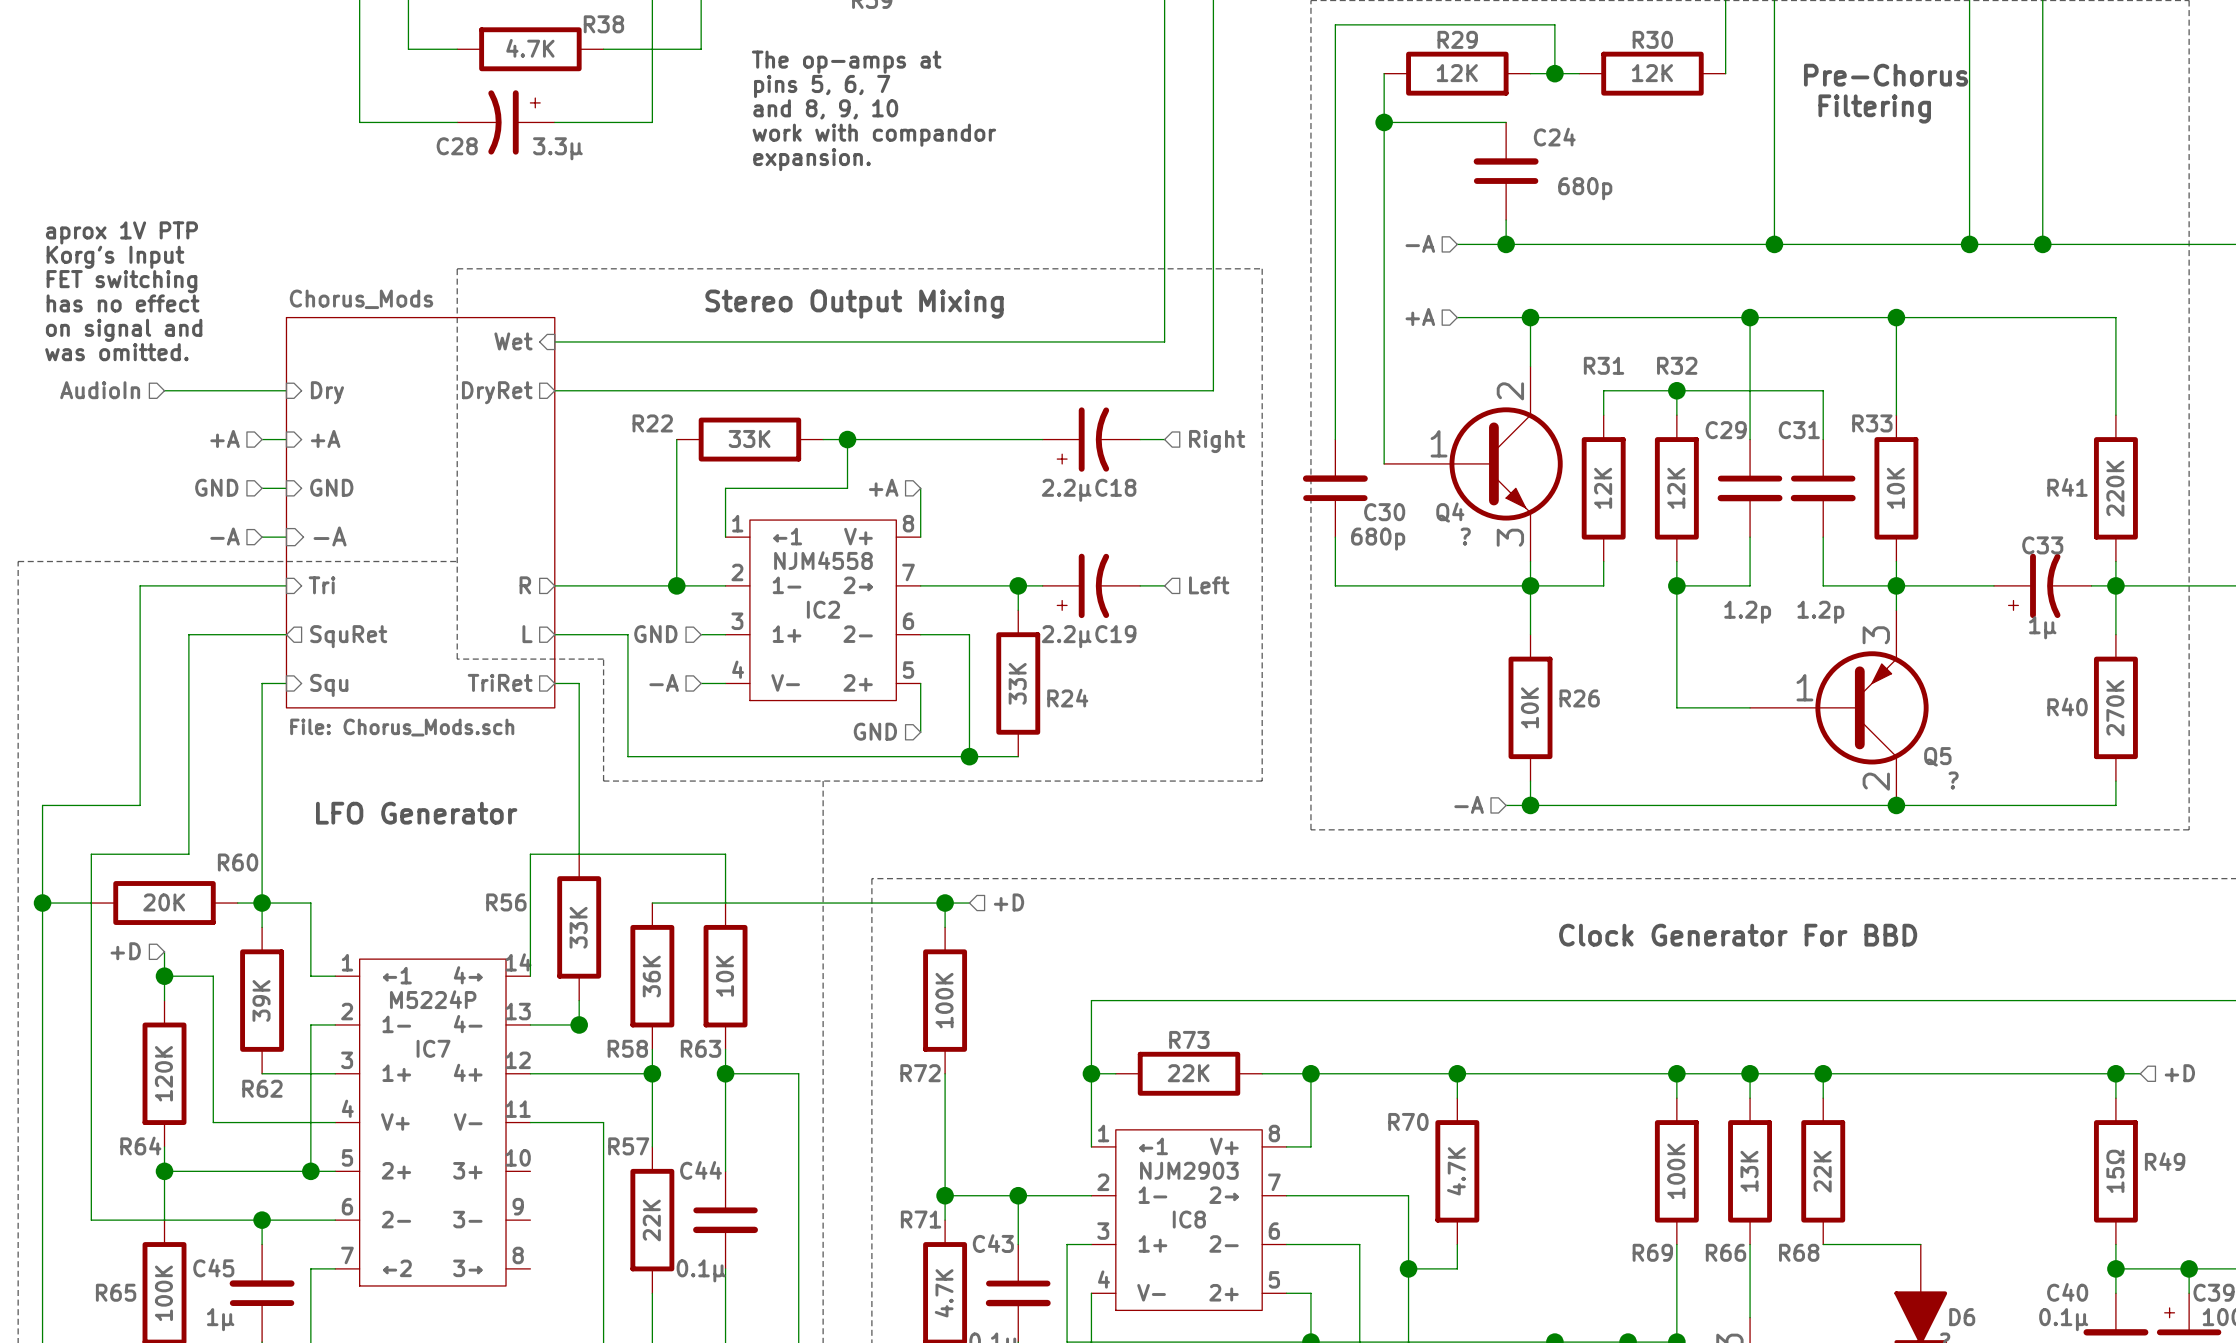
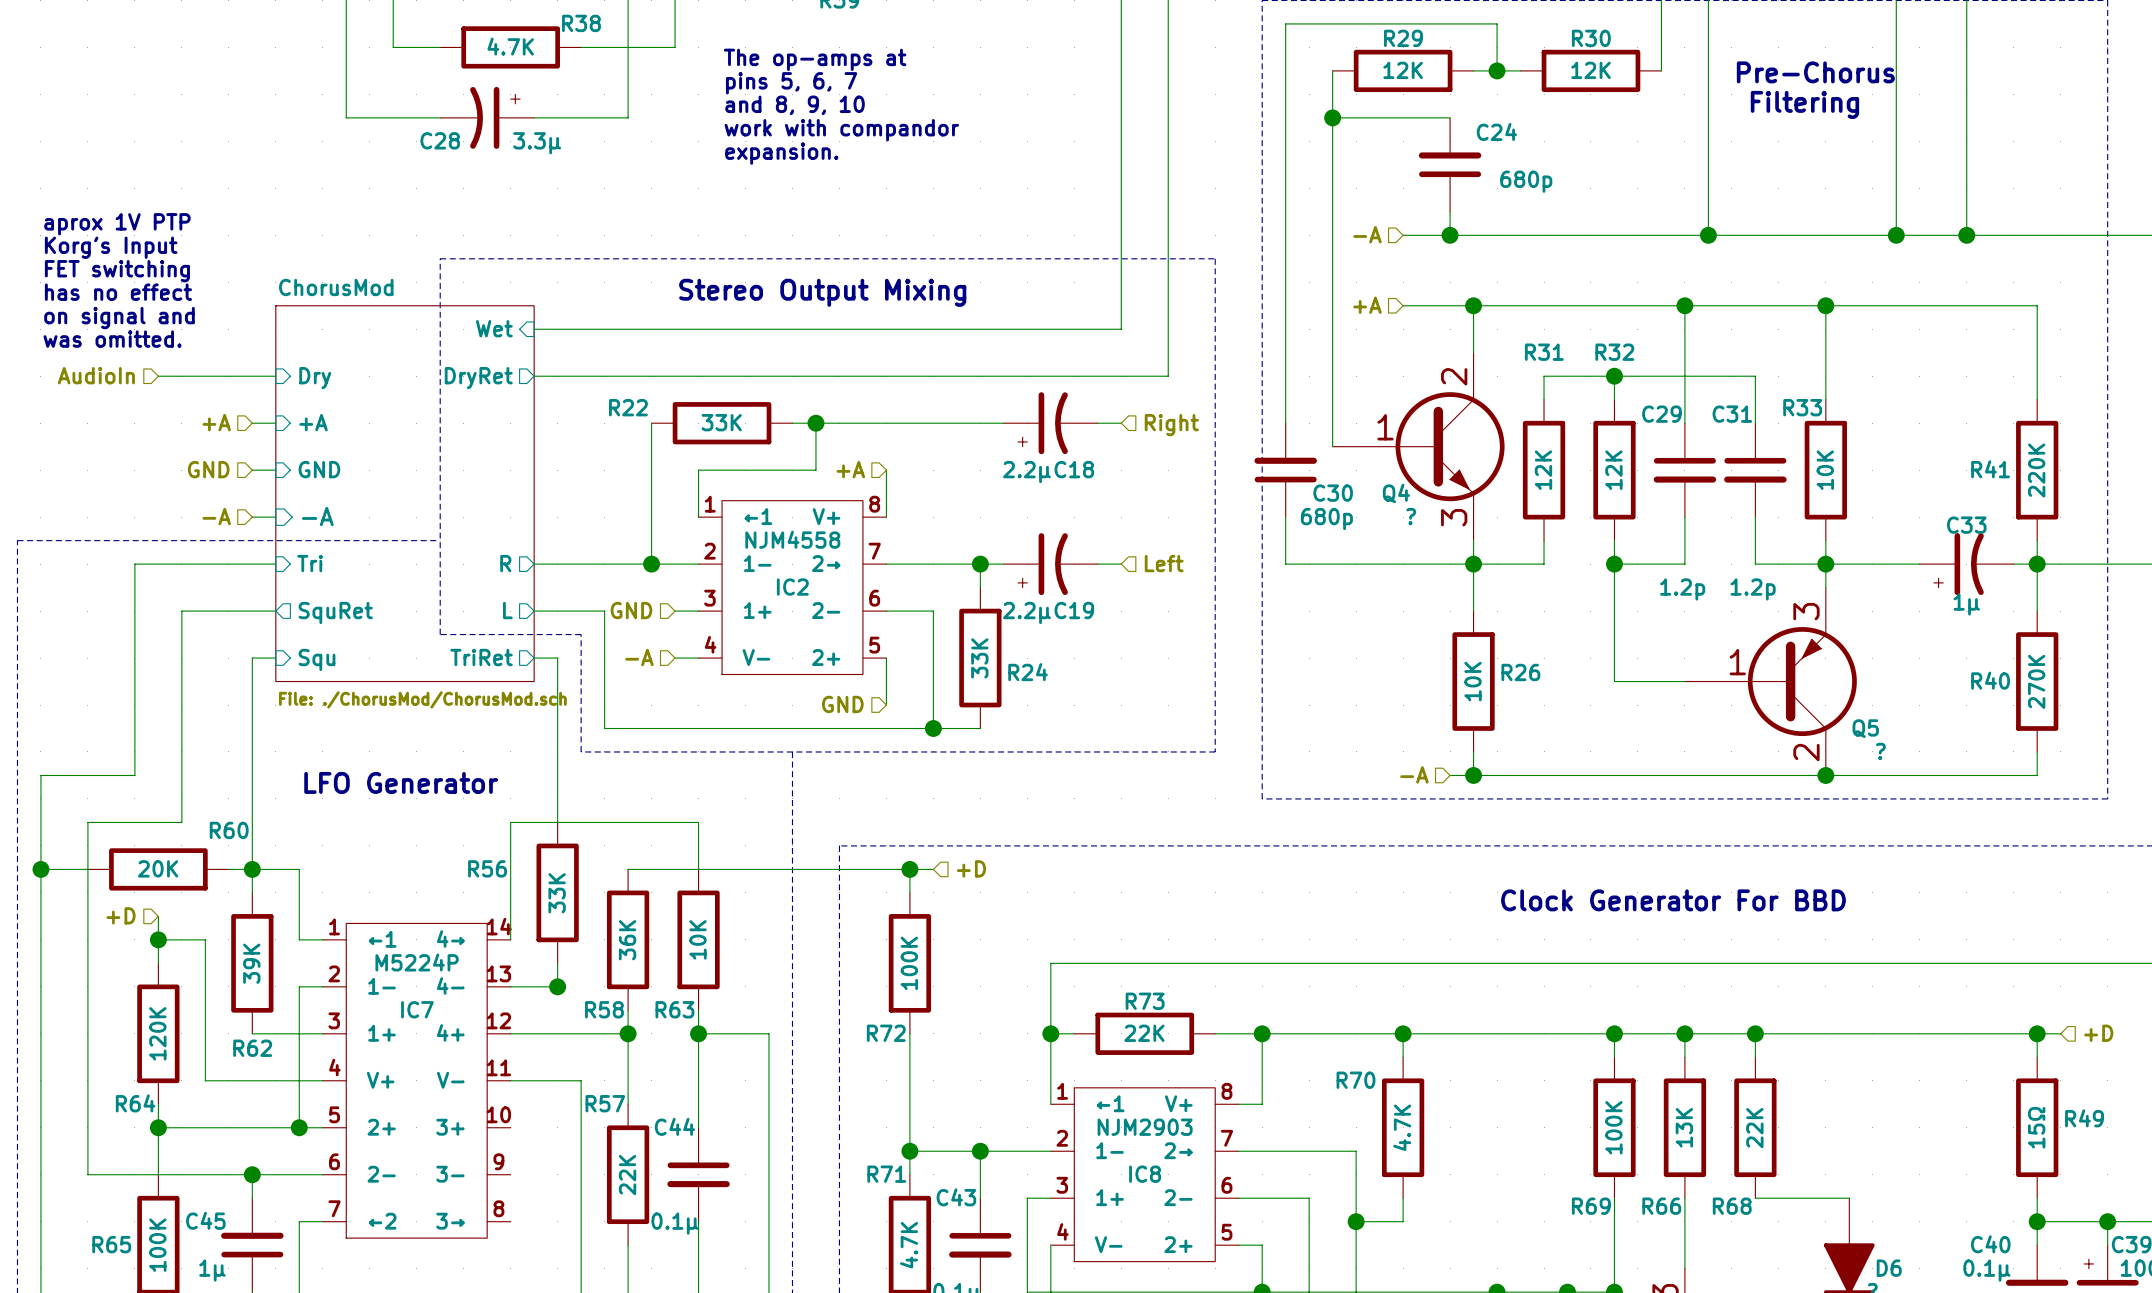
sheet Chorus_Mods name: Chorus_Mods (361, 299) -> ChorusMod (336, 287)
sheet Chorus_Mods value: File: Chorus_Mods.sch (402, 727) -> File: ./ChorusMod/ChorusMod.sch (422, 699)

